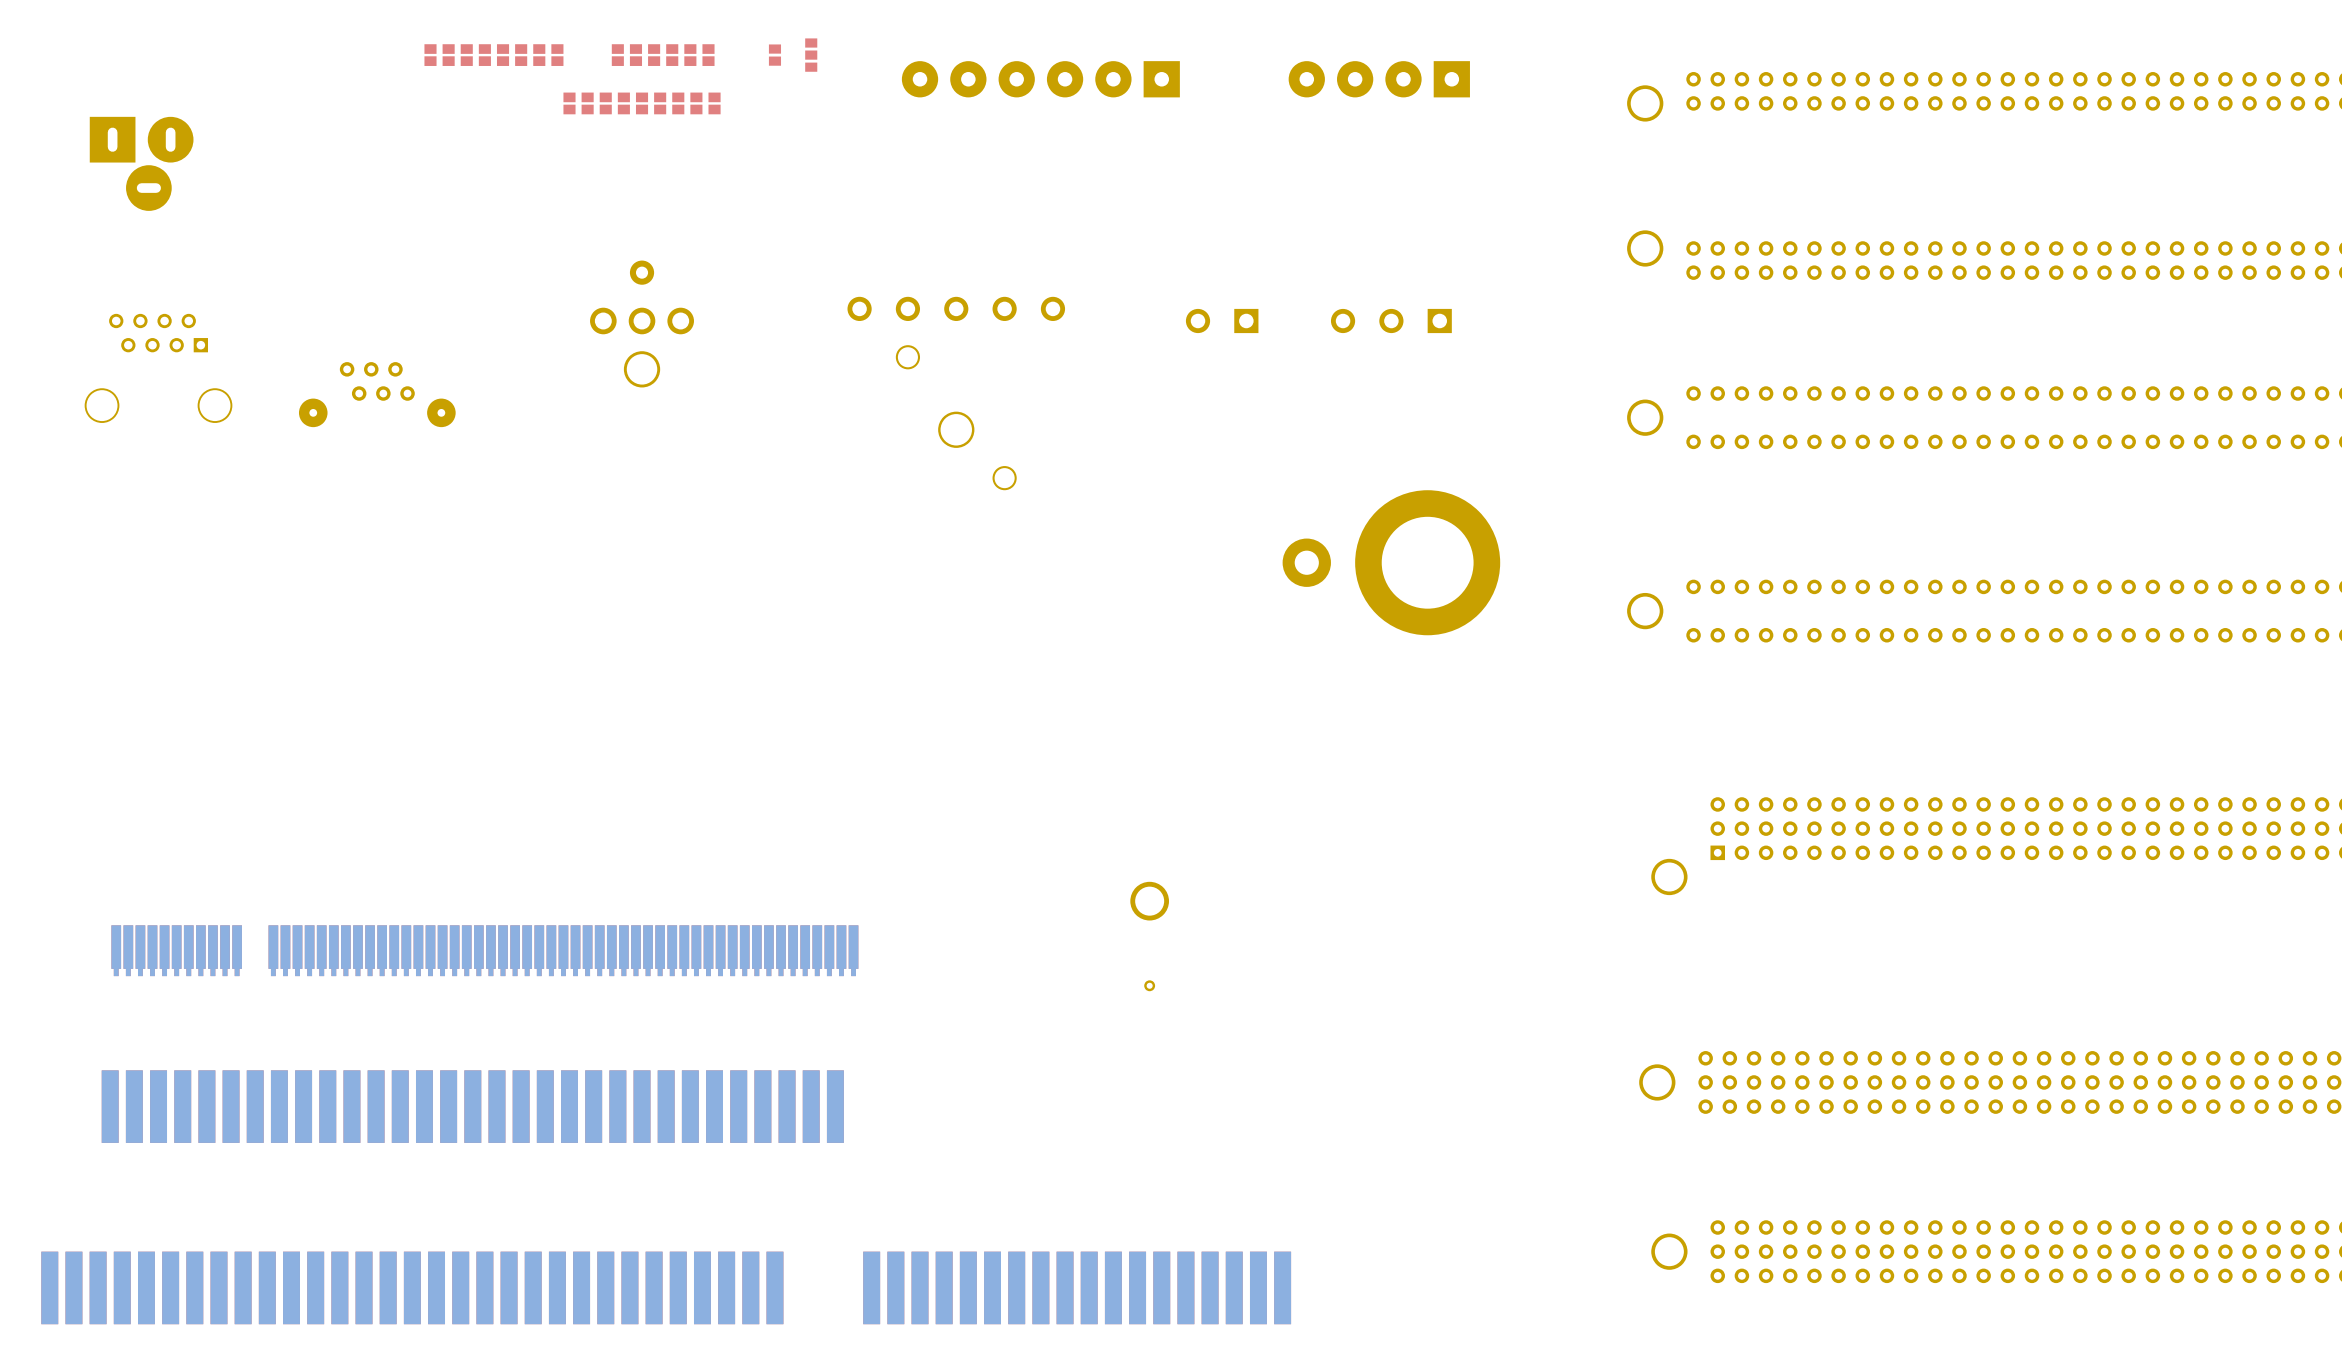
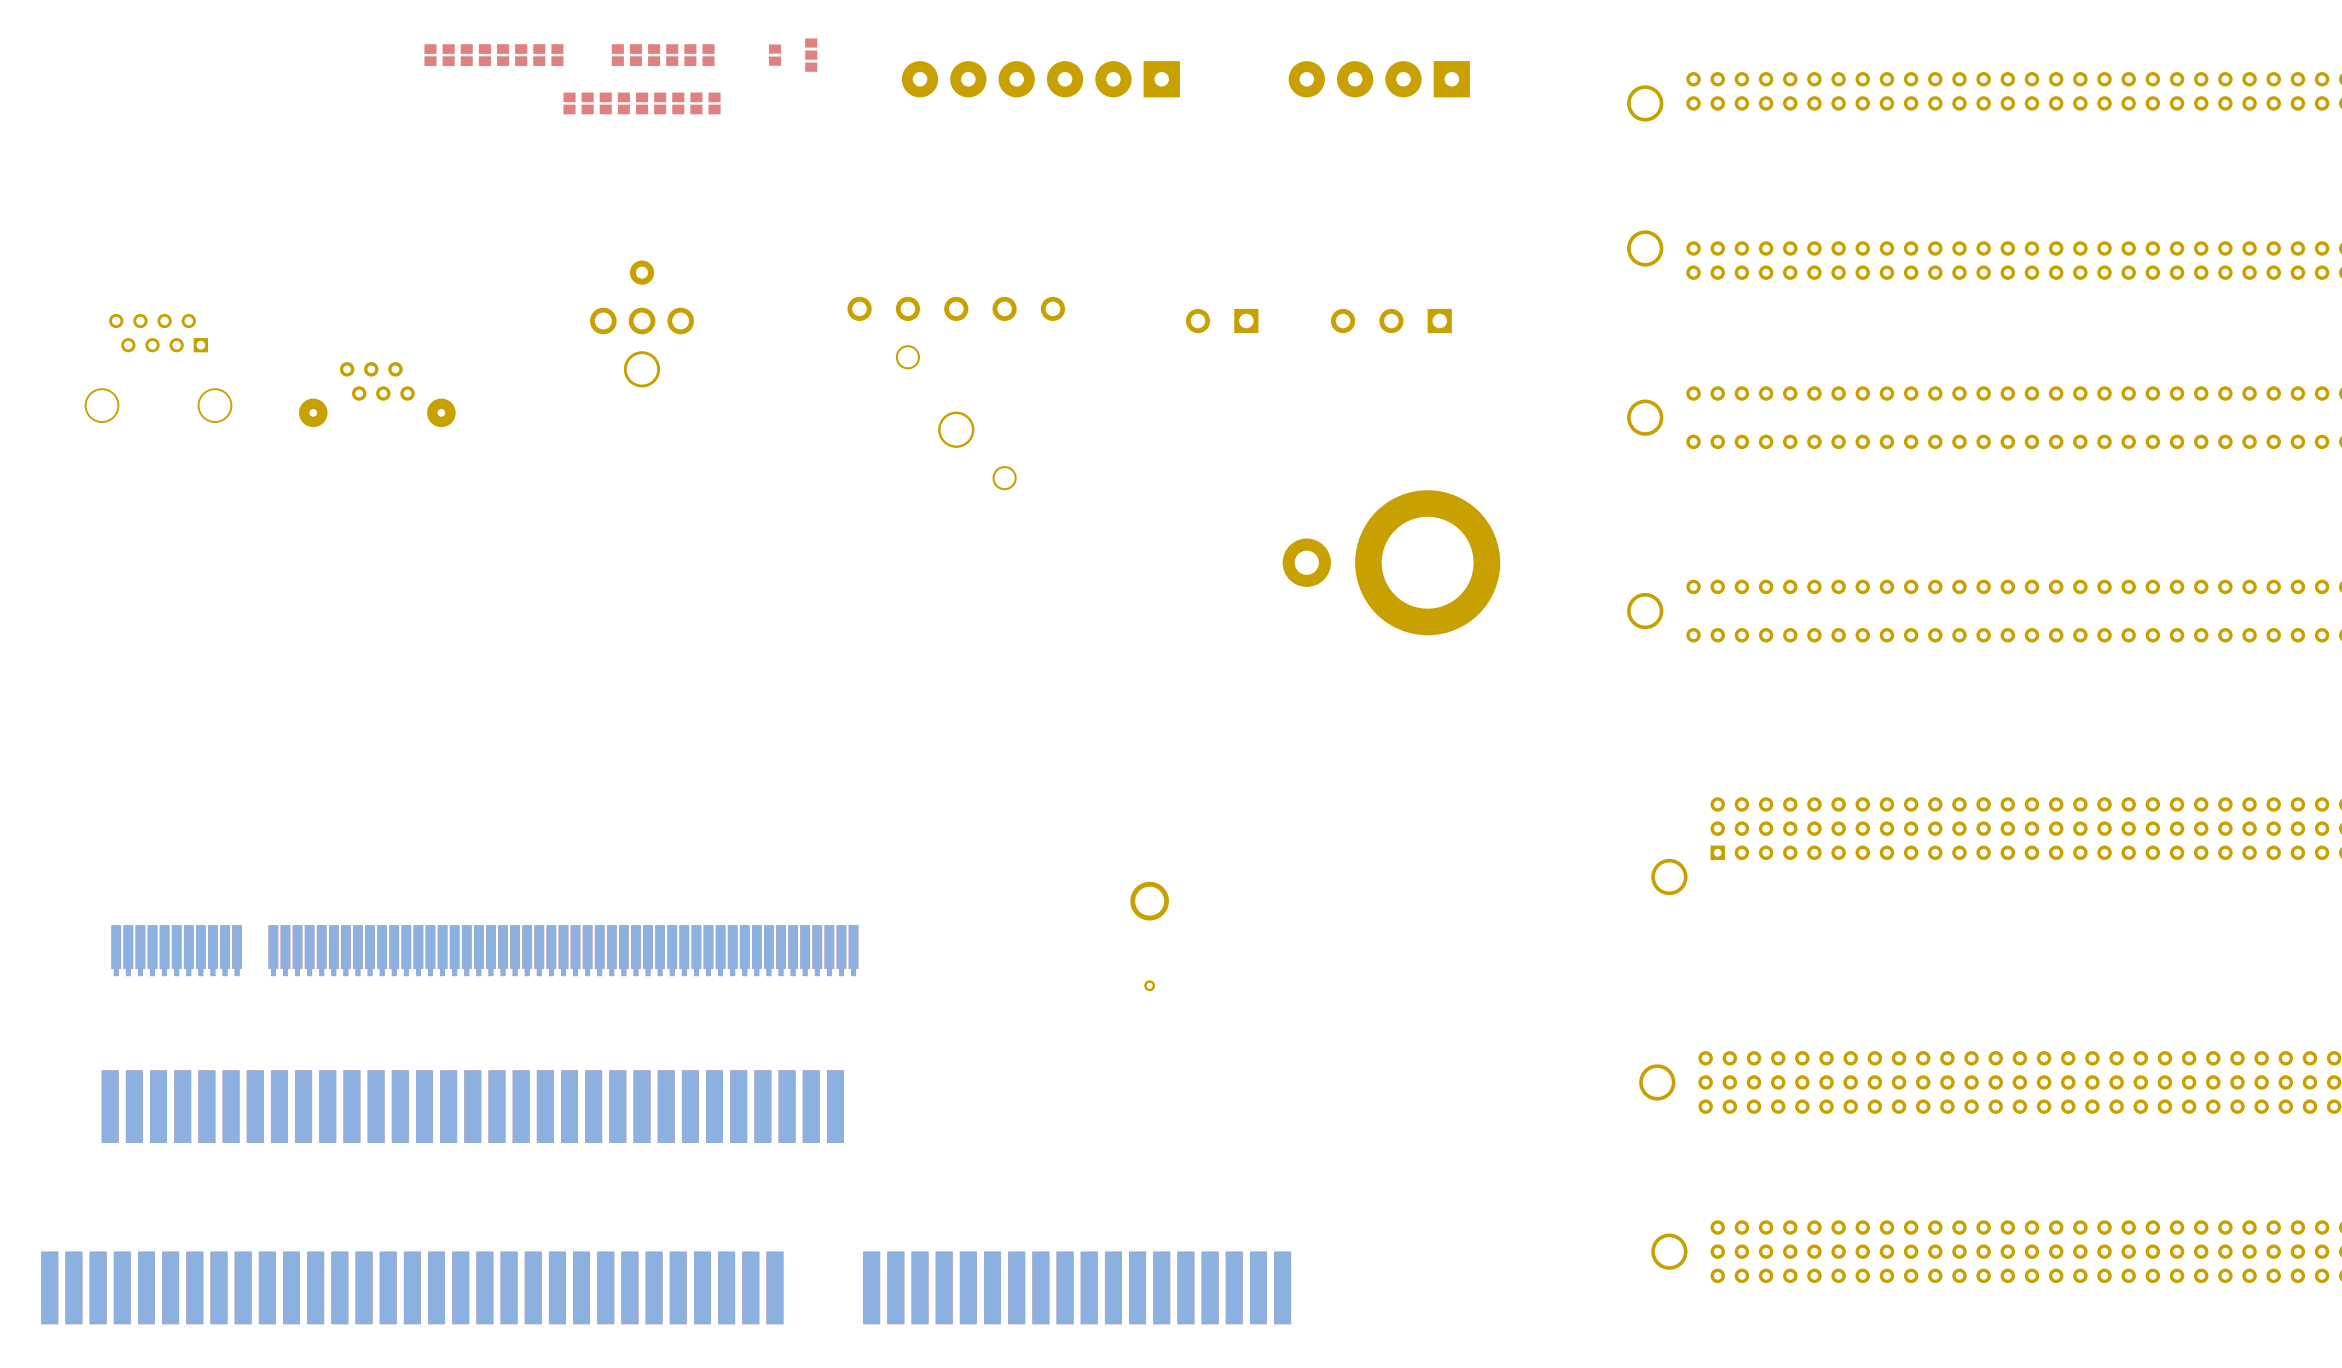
part: (141, 163) -> none

